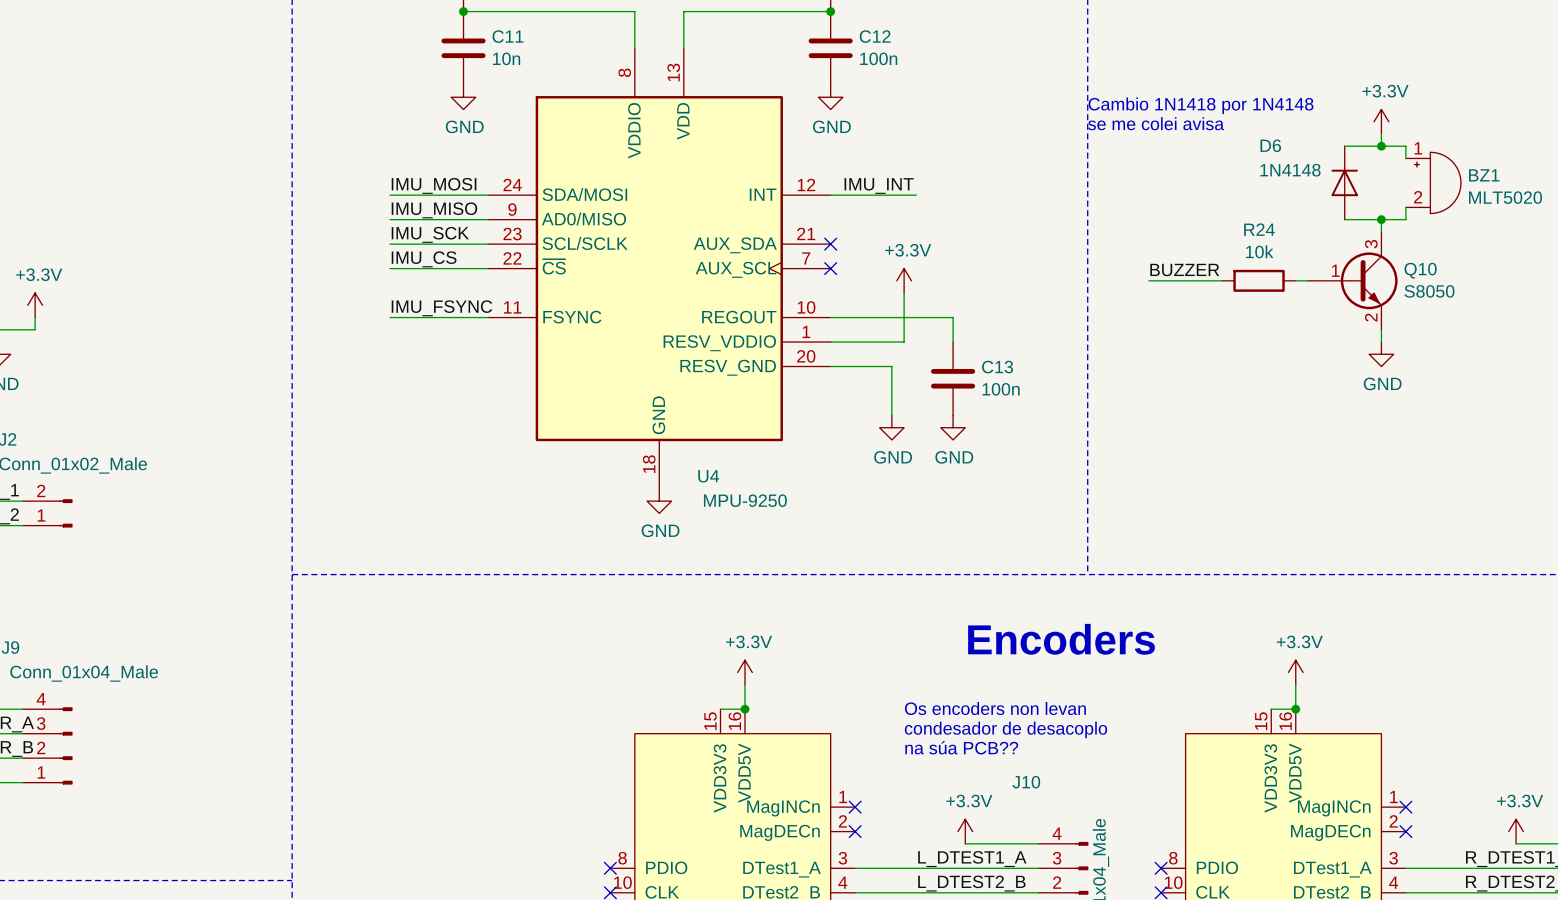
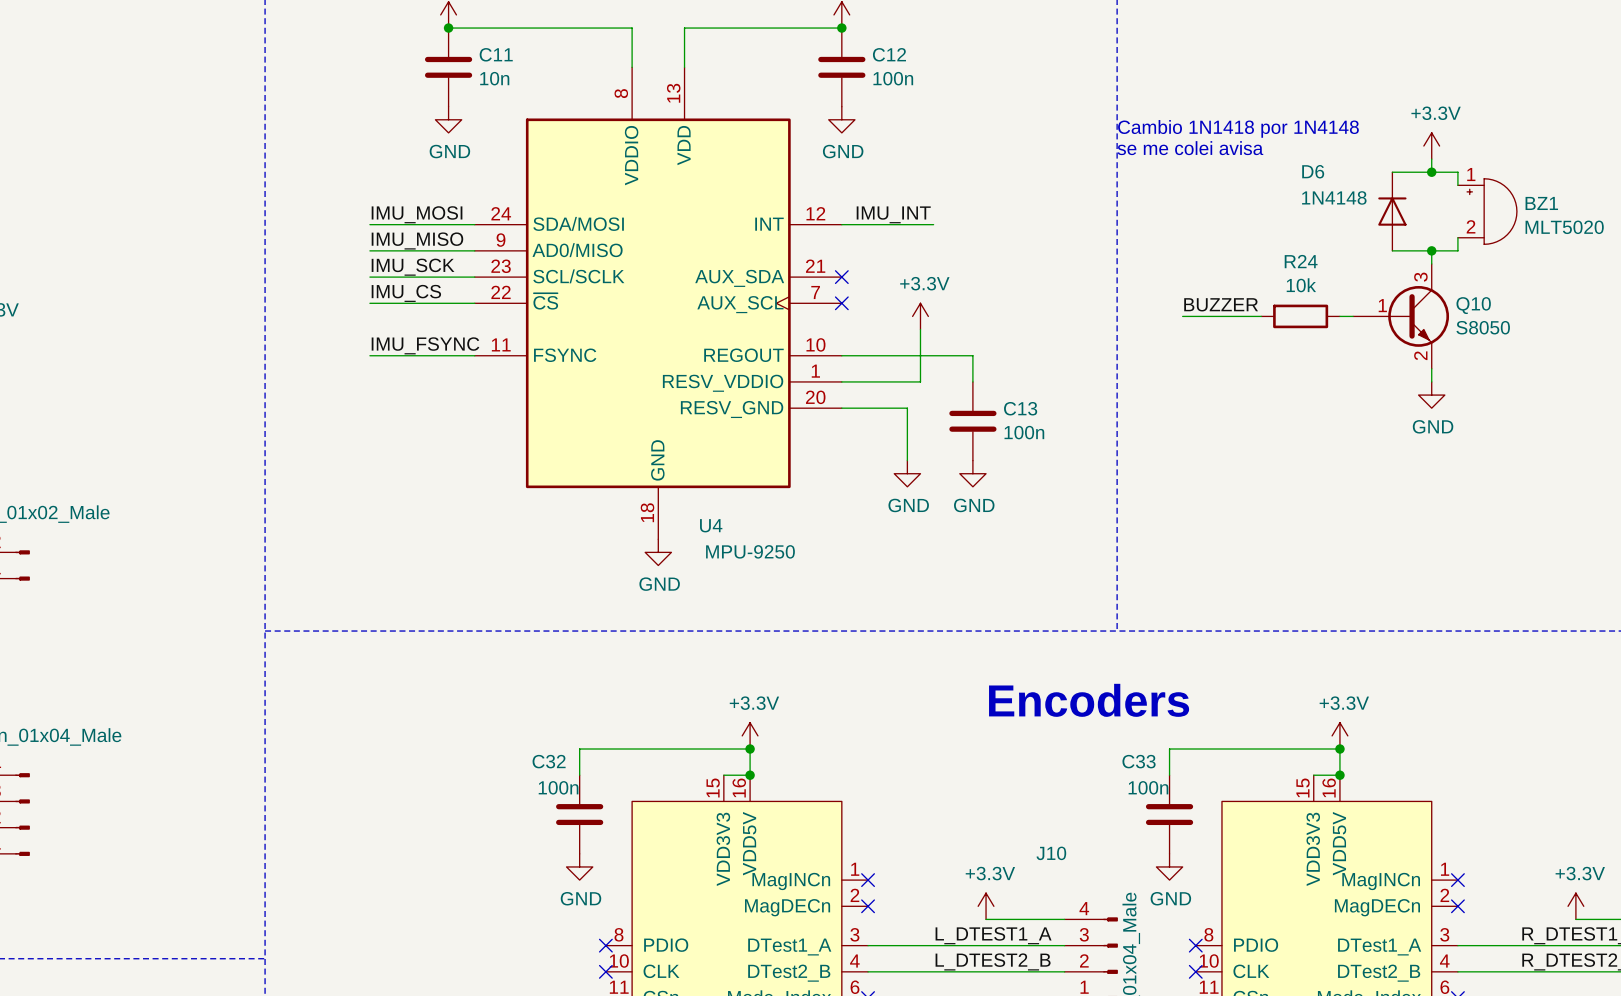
wire: none -> (750, 749) (579, 749) (579, 775)
junction: none -> (750, 749)
wire: none -> (1339, 749) (1169, 749) (1169, 775)
junction: none -> (1339, 749)
text: Os encoders non levan (995, 708) -> none
text: condesador de desacoplo (1005, 729) -> none
C32: none -> 100n (579, 814)
C33: none -> 100n (1169, 814)
text: na súa PCB?? (961, 747) -> none
power symbol: none -> GND (579, 866)
power symbol: none -> GND (1169, 866)

